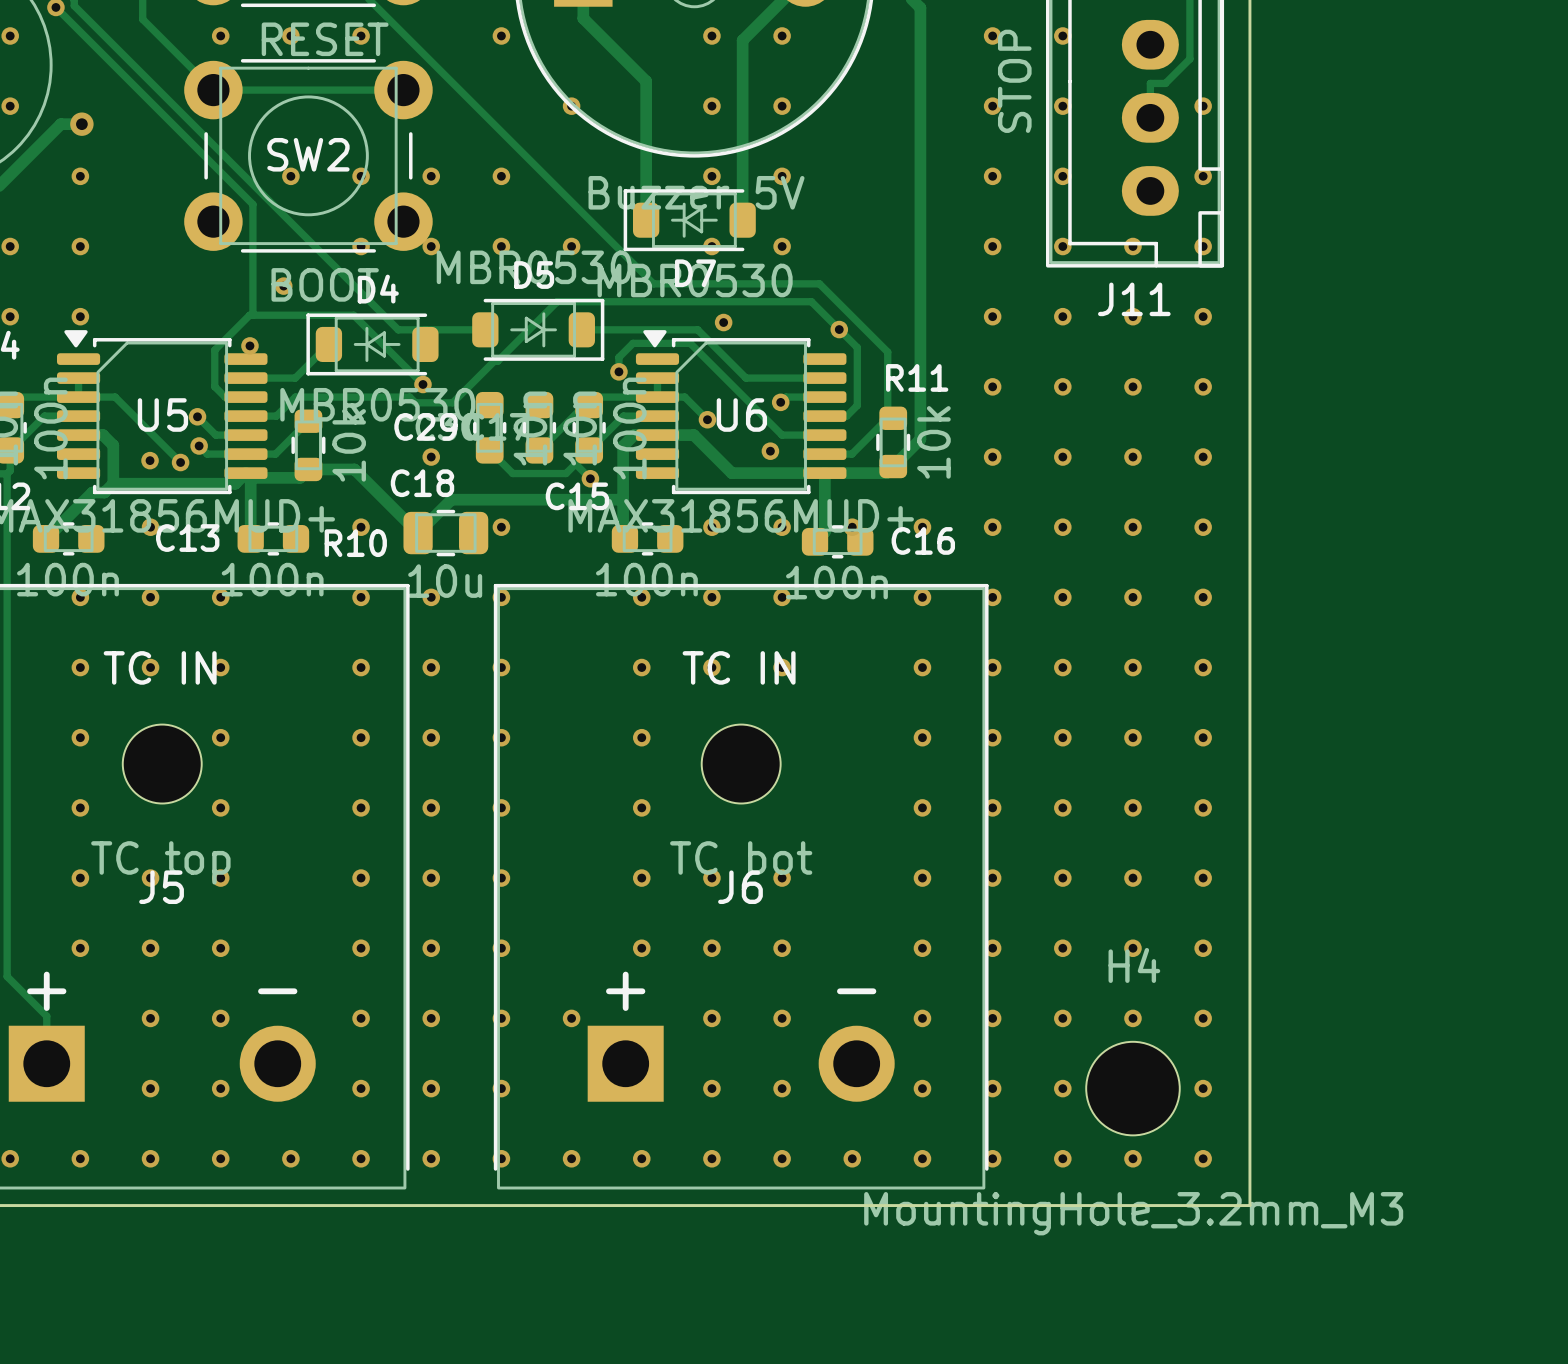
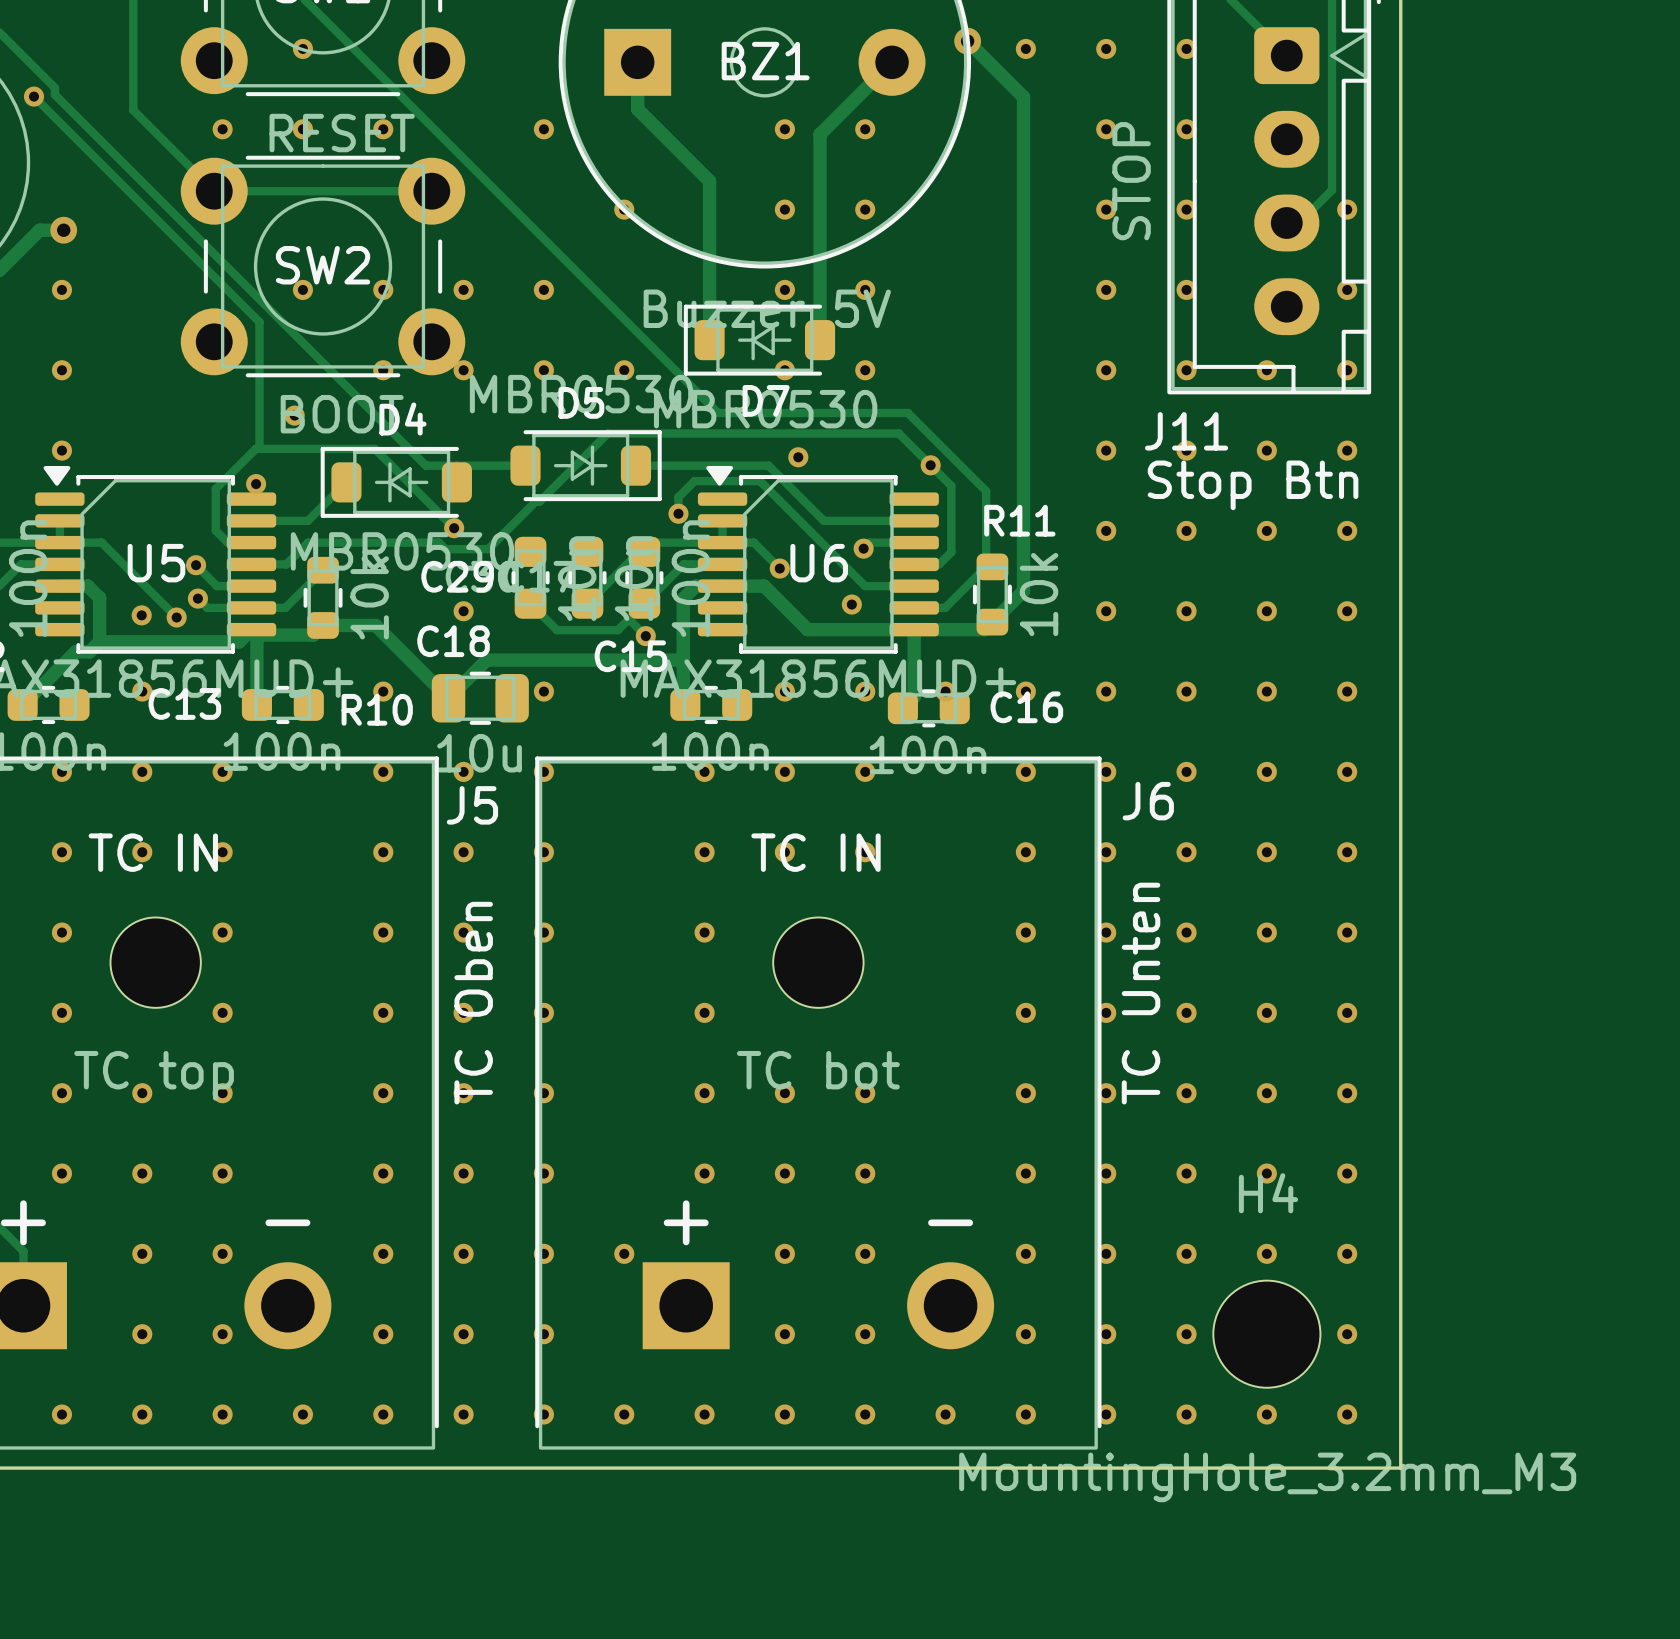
track: (1189, 58) (1165, 83) (1150, 83) (1150, 117) -> (1332, 155) (1332, 190) (1299, 222) (1286, 222)
J11 name position: J11 (1134, 299) -> J11 (1186, 431)
text: none -> Stop Btn (1253, 485)
text: none -> TC Unten (1141, 993)
text: none -> TC Oben (473, 1003)
J5 name position: J5 (161, 887) -> J5 (472, 805)
J6 name position: J6 (740, 887) -> J6 (1148, 801)

